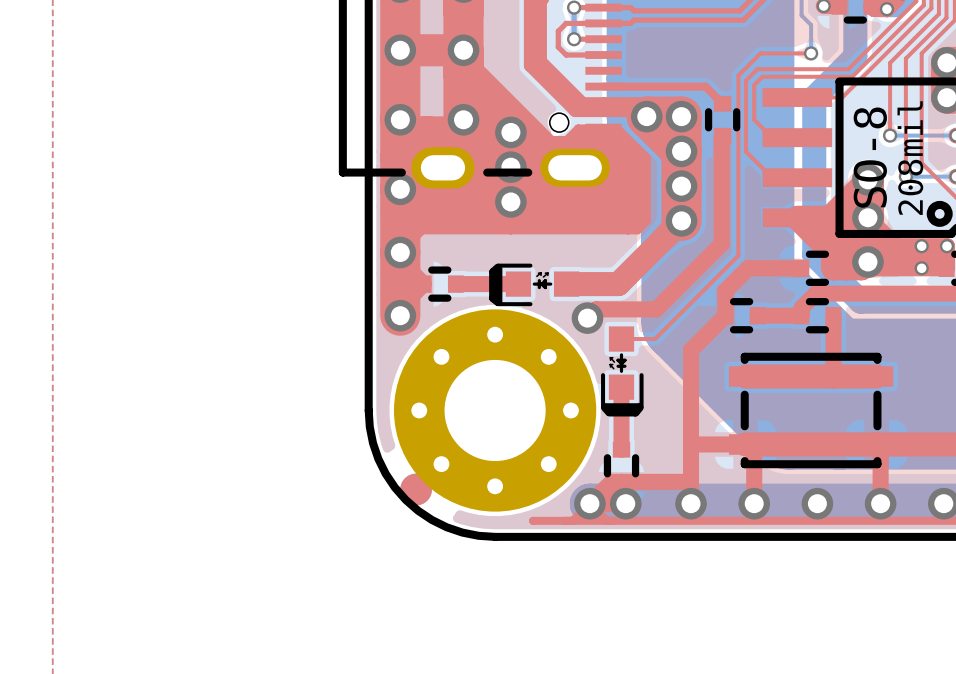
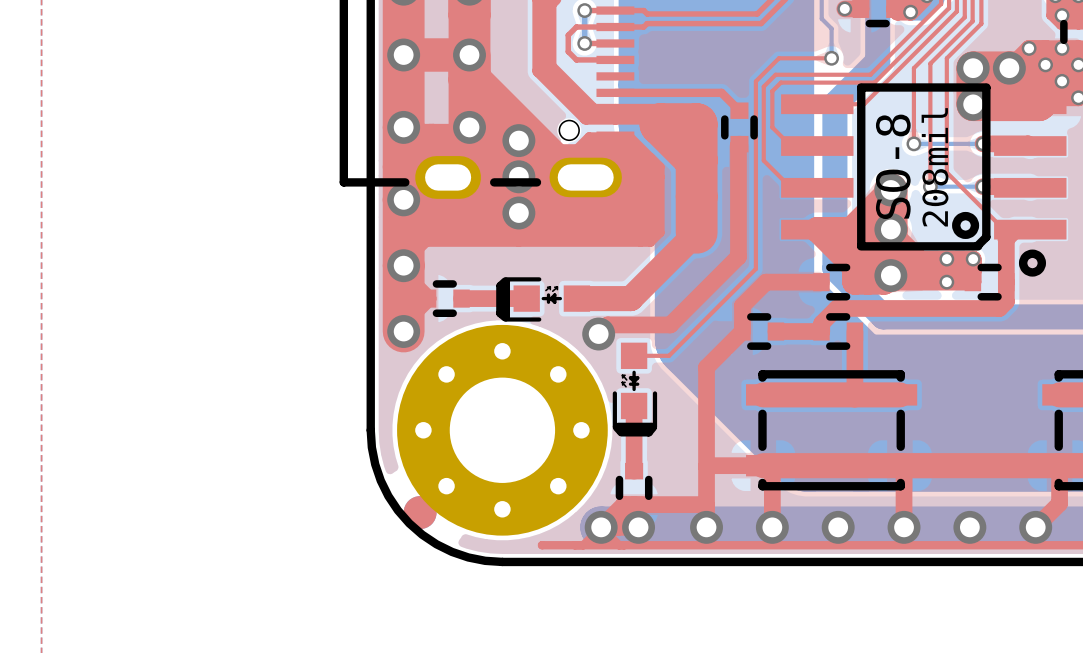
via: (646, 116) -> none
via: (681, 116) -> none
via: (681, 151) -> none
via: (681, 186) -> none
via: (681, 220) -> none

